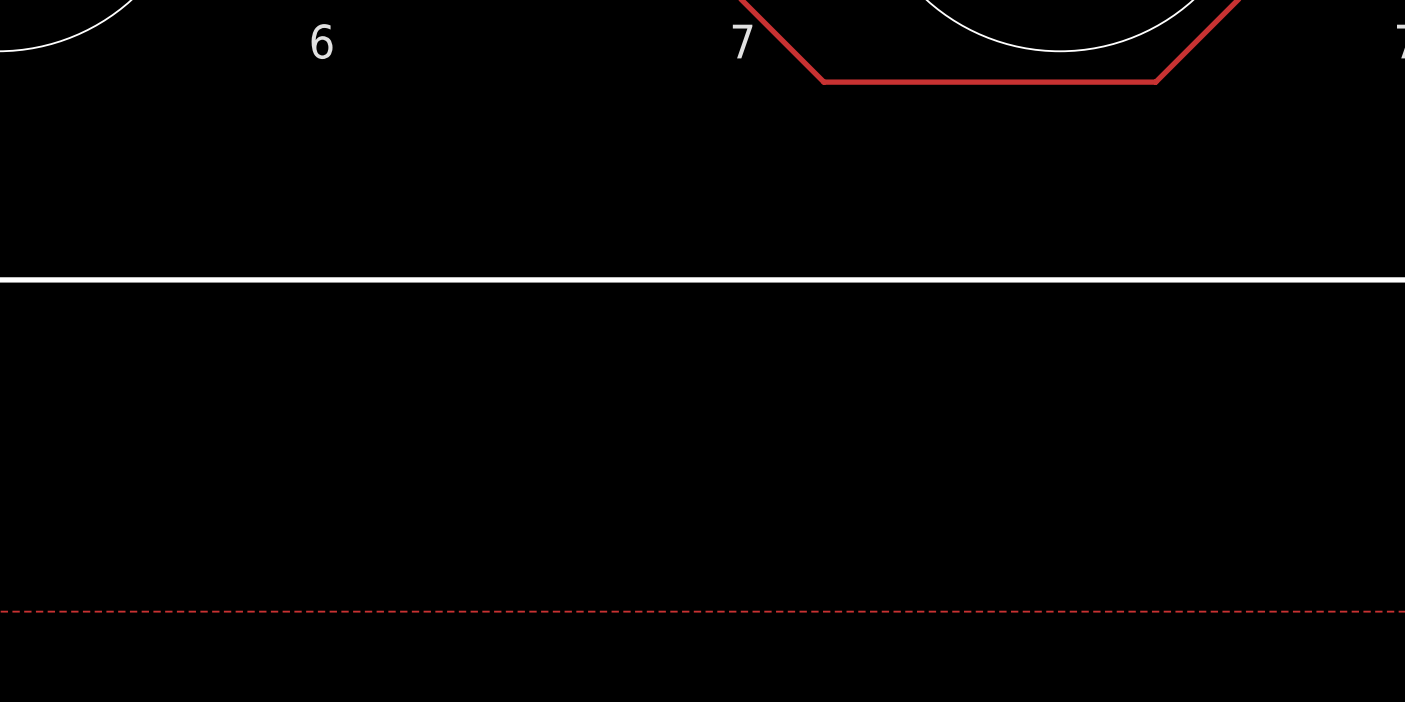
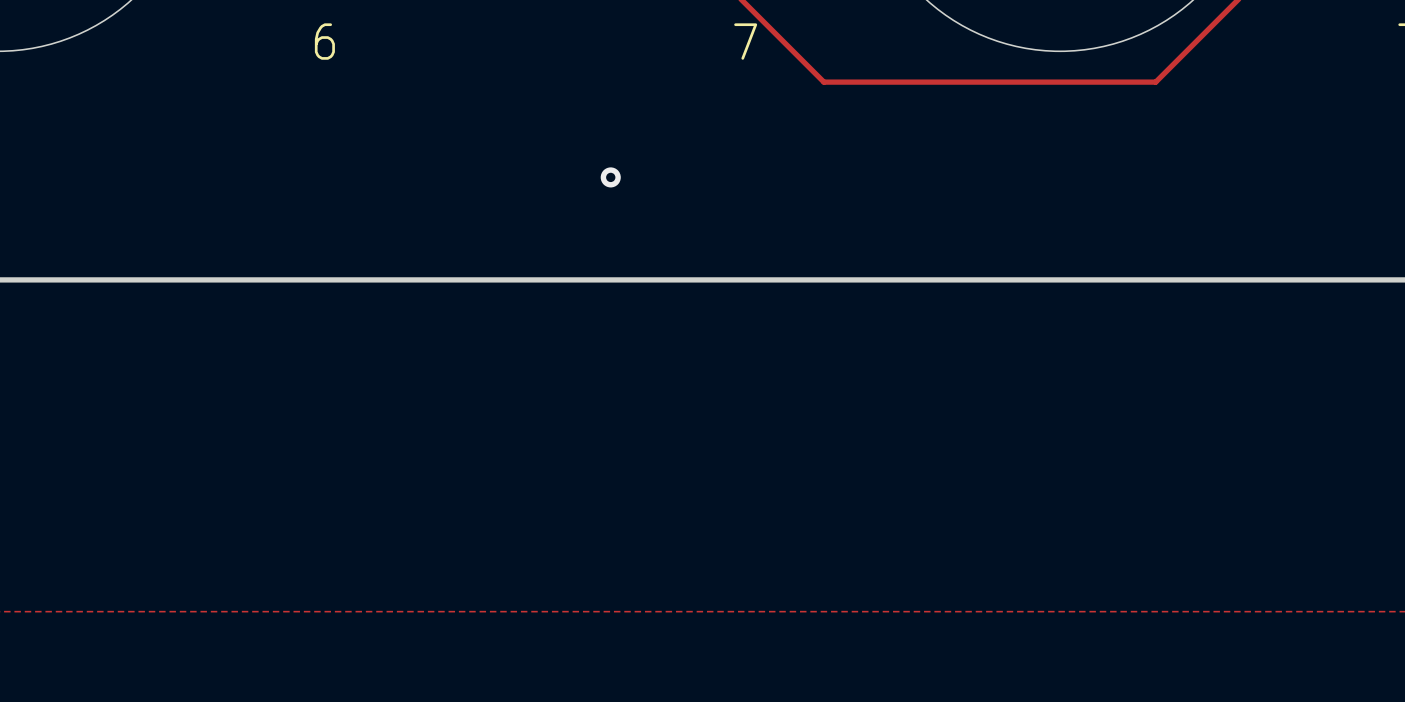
via: none -> (610, 177)

